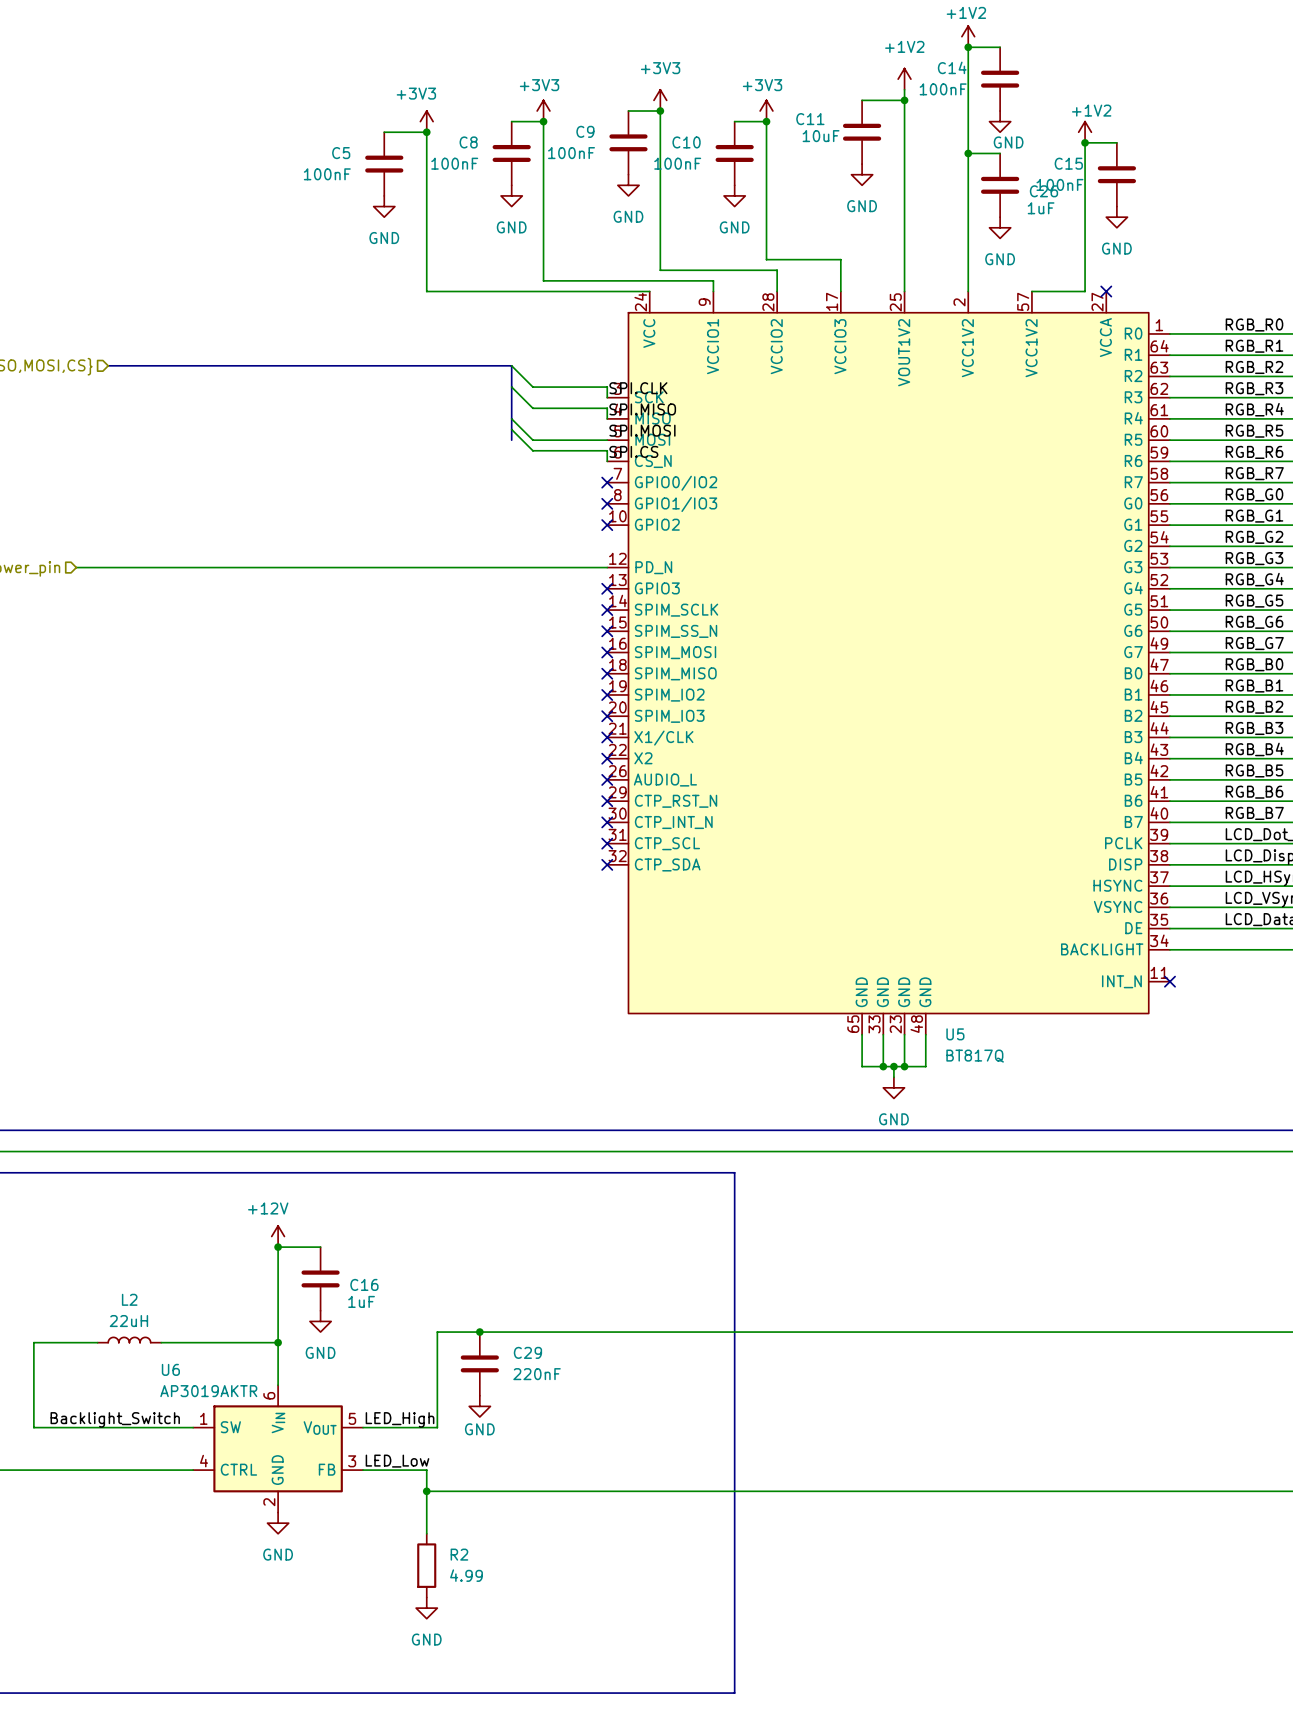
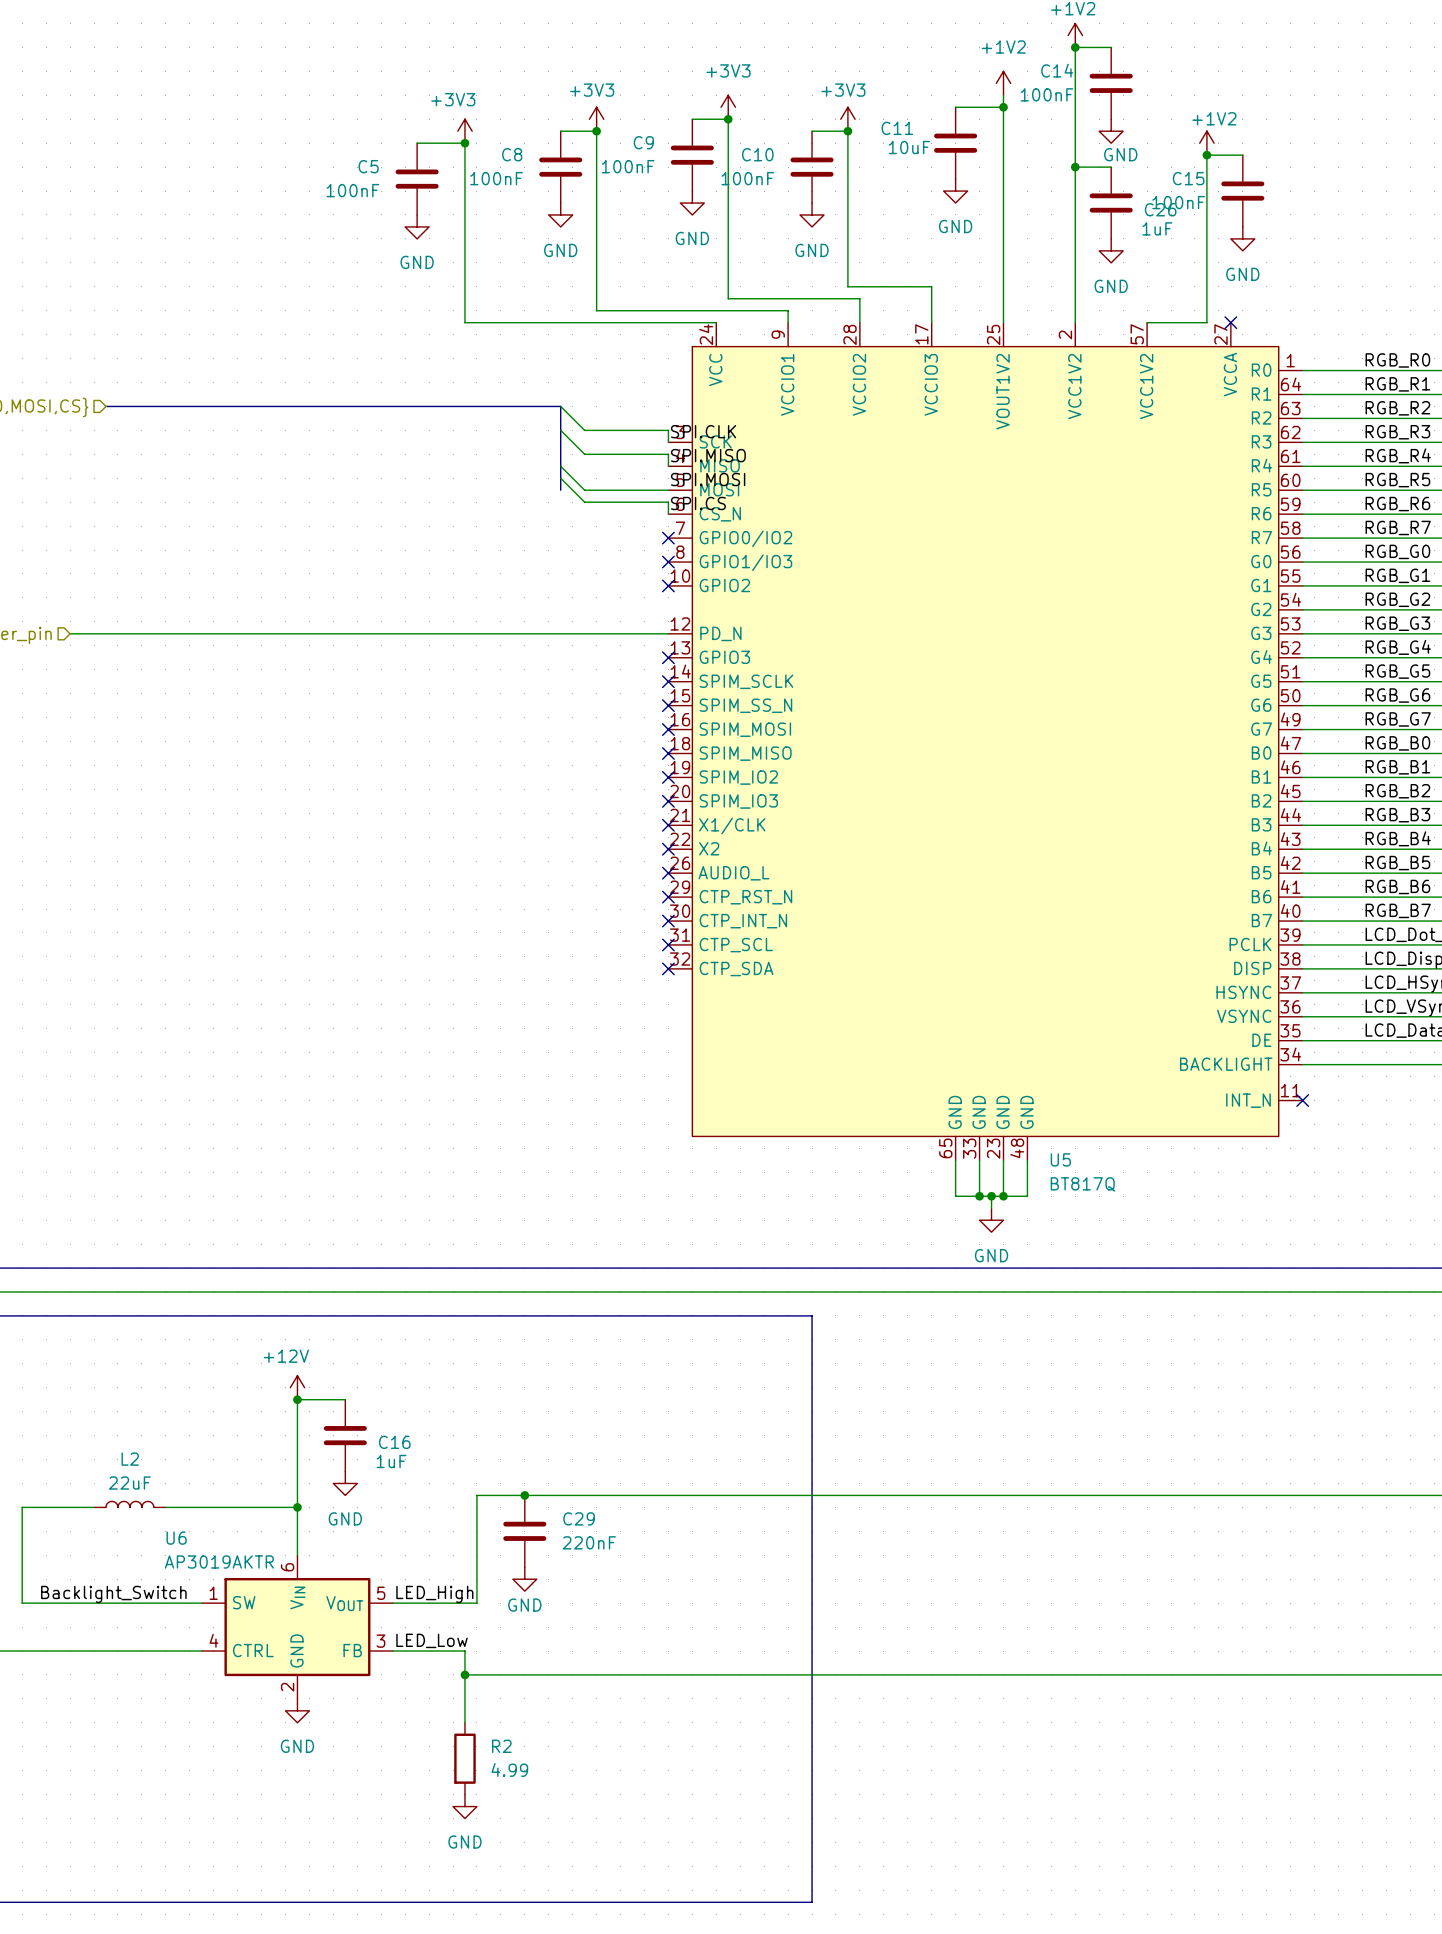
L2 value: 22uH (128, 1321) -> 22uF (129, 1483)

